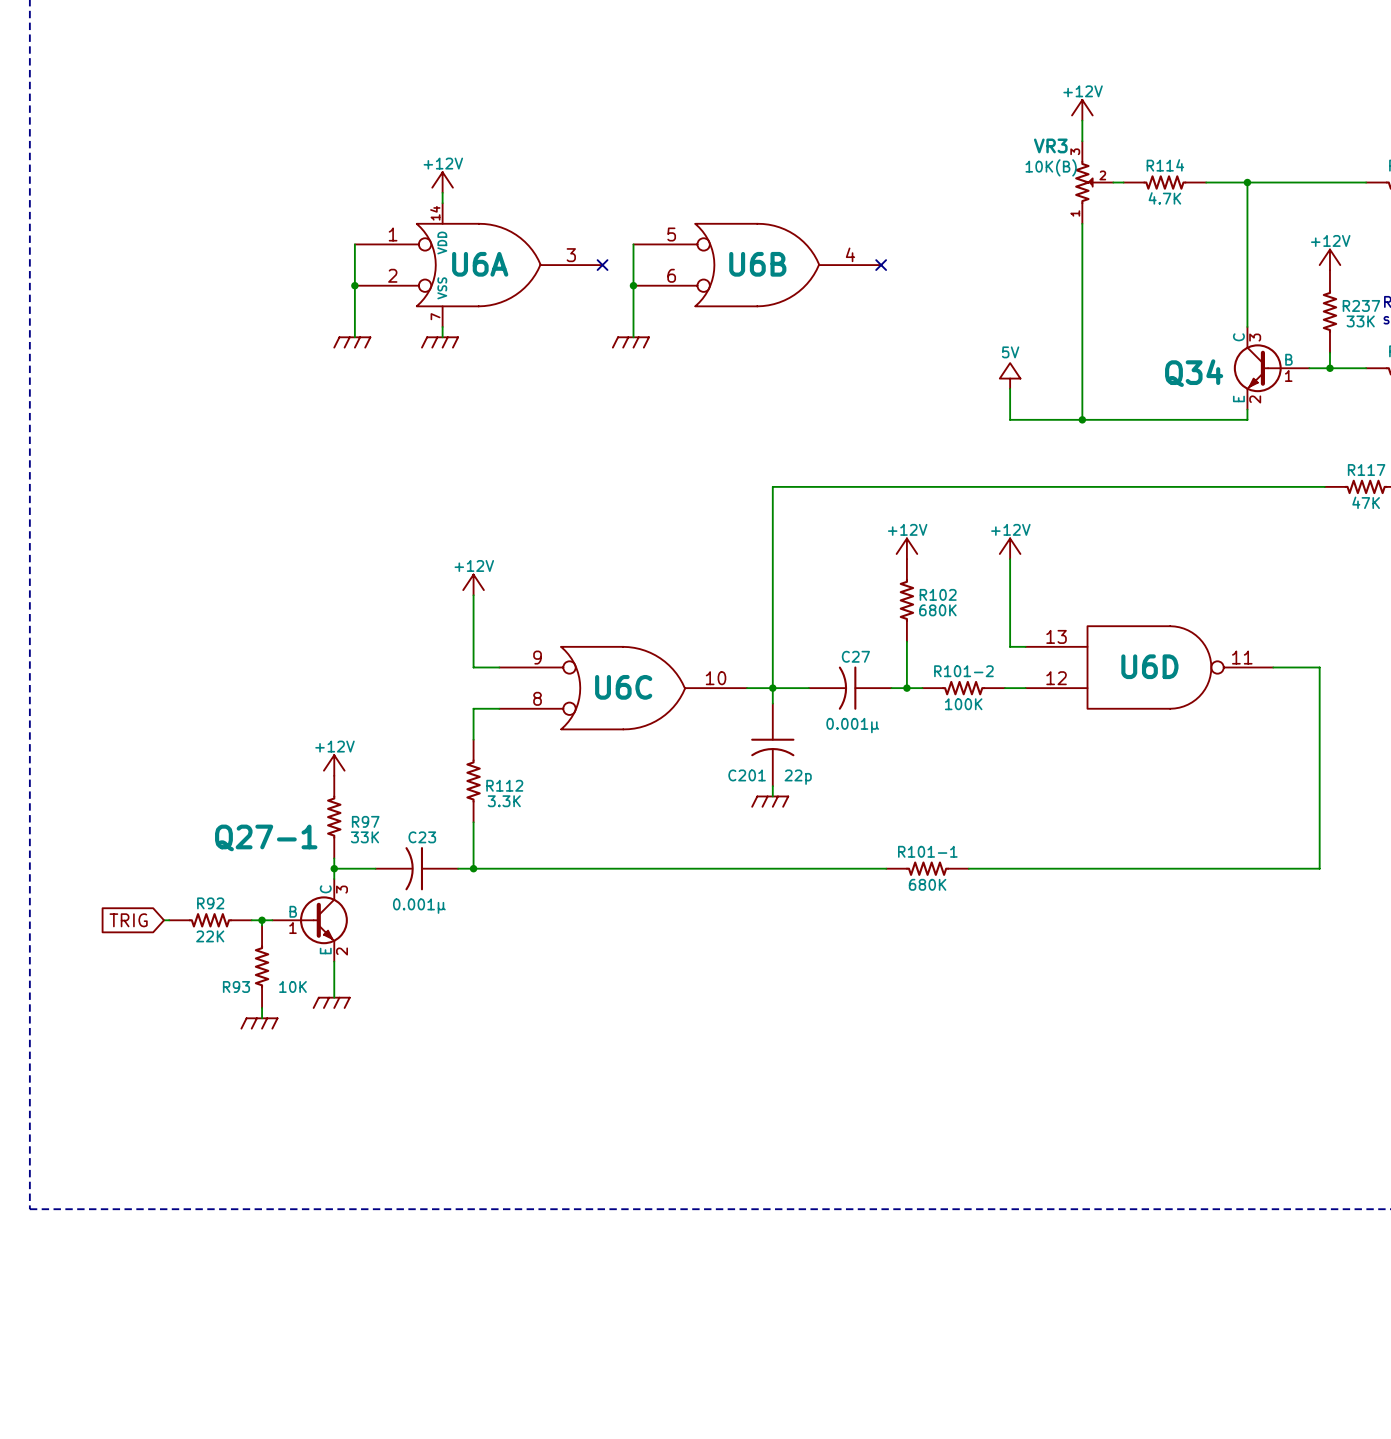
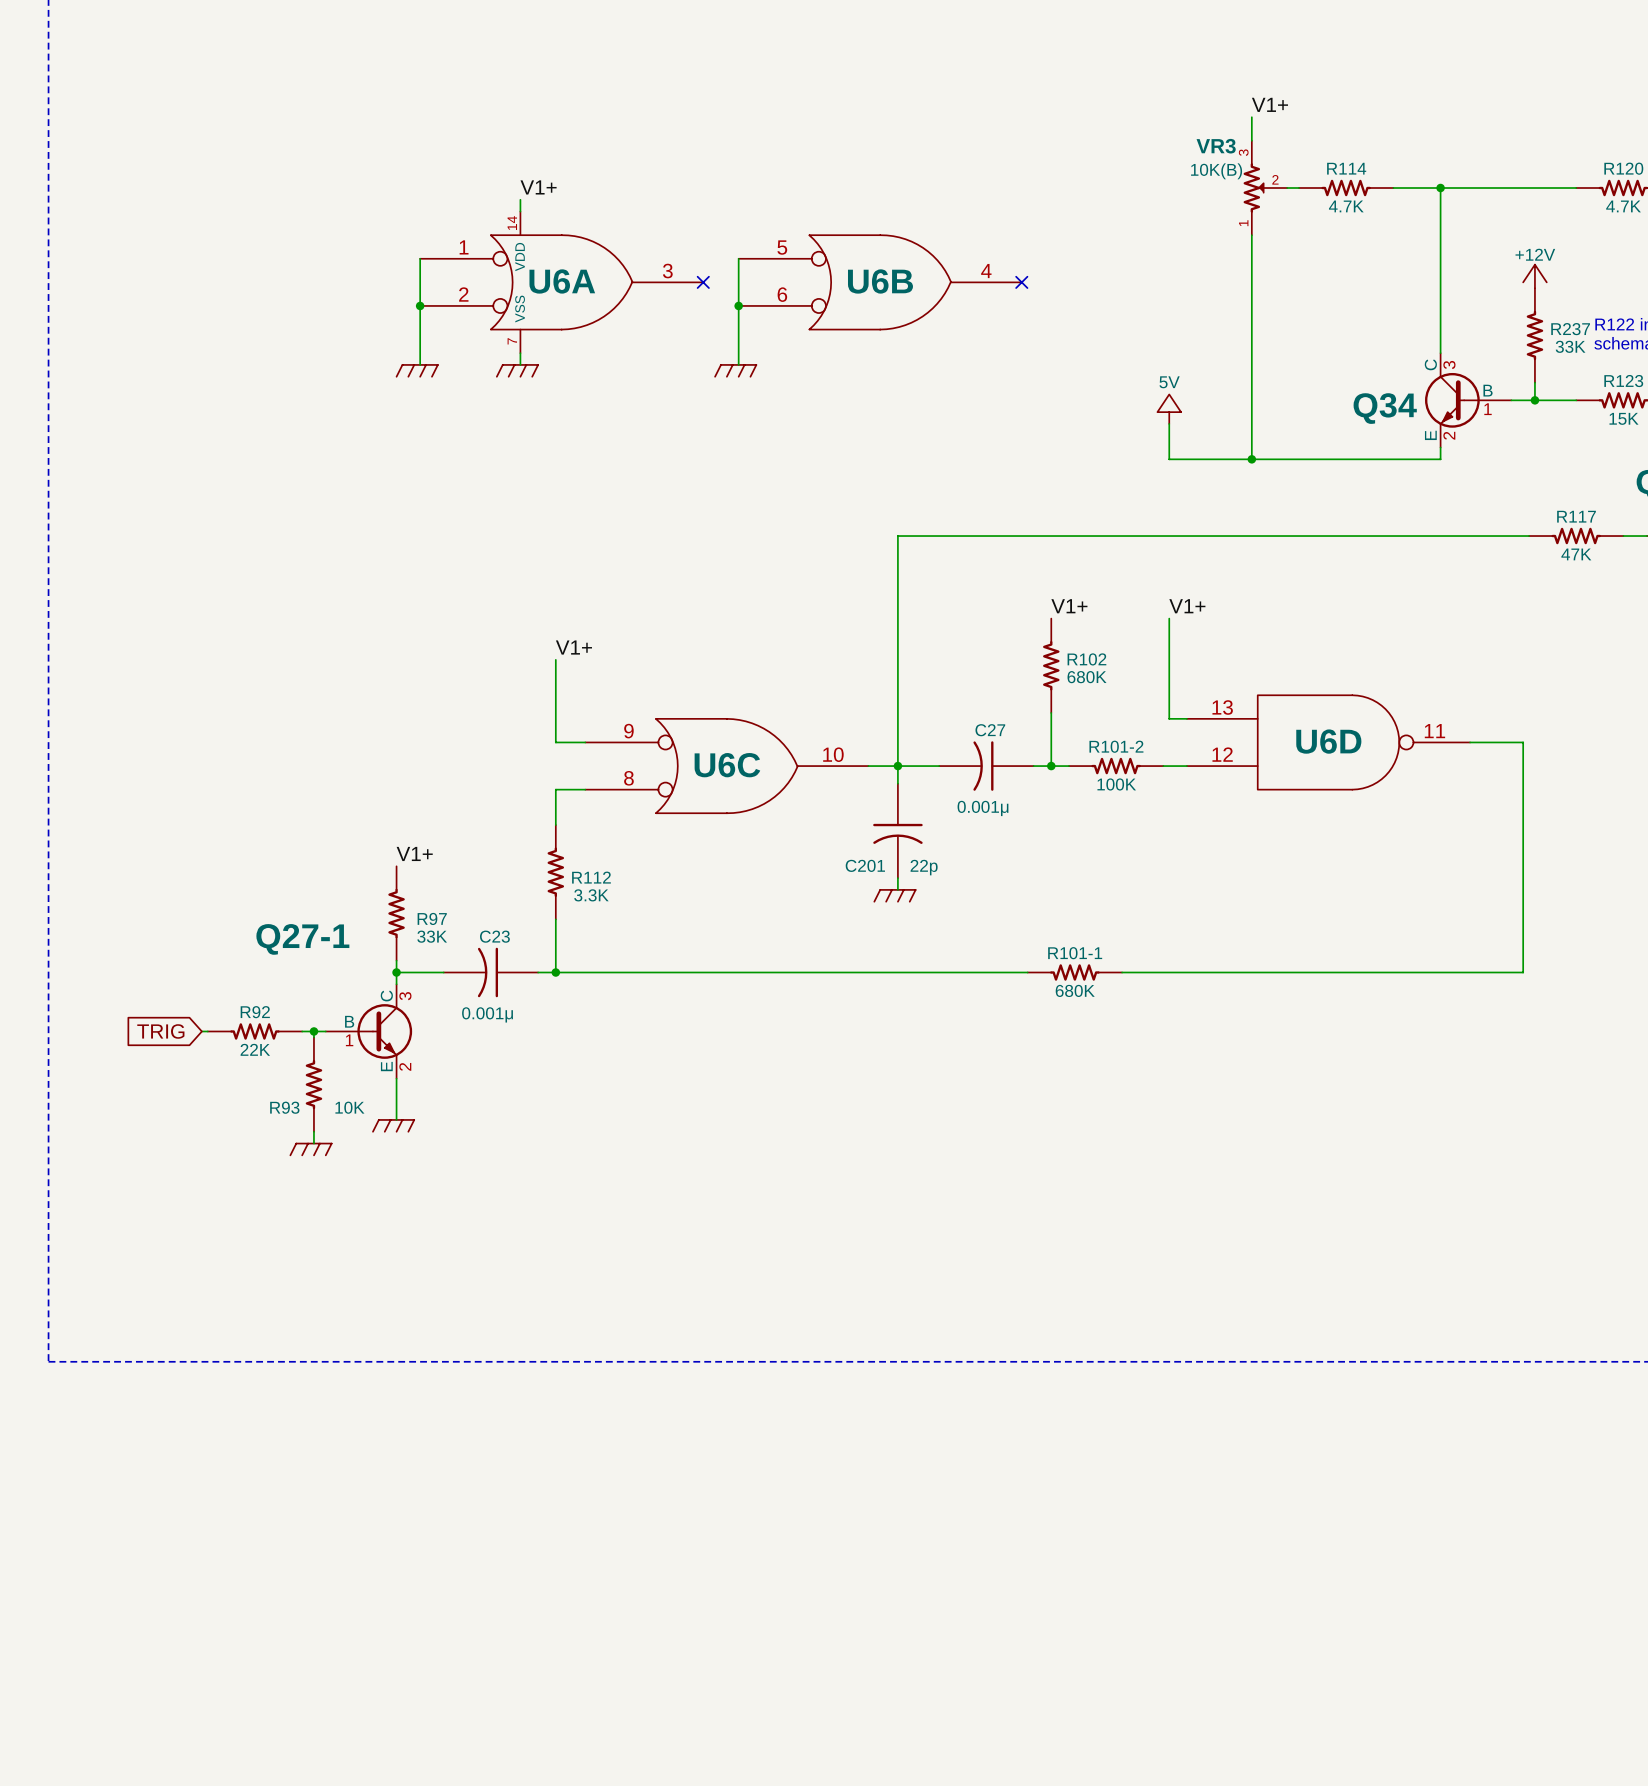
label: none -> V1+ (1269, 104)
power symbol: +12V (1082, 110) -> none
power symbol: +12V (442, 182) -> none
label: none -> V1+ (538, 187)
power symbol: +12V (906, 548) -> none
label: none -> V1+ (1069, 606)
power symbol: +12V (1010, 548) -> none
label: none -> V1+ (1187, 606)
power symbol: +12V (473, 584) -> none
label: none -> V1+ (573, 647)
power symbol: +12V (334, 765) -> none
label: none -> V1+ (414, 853)

